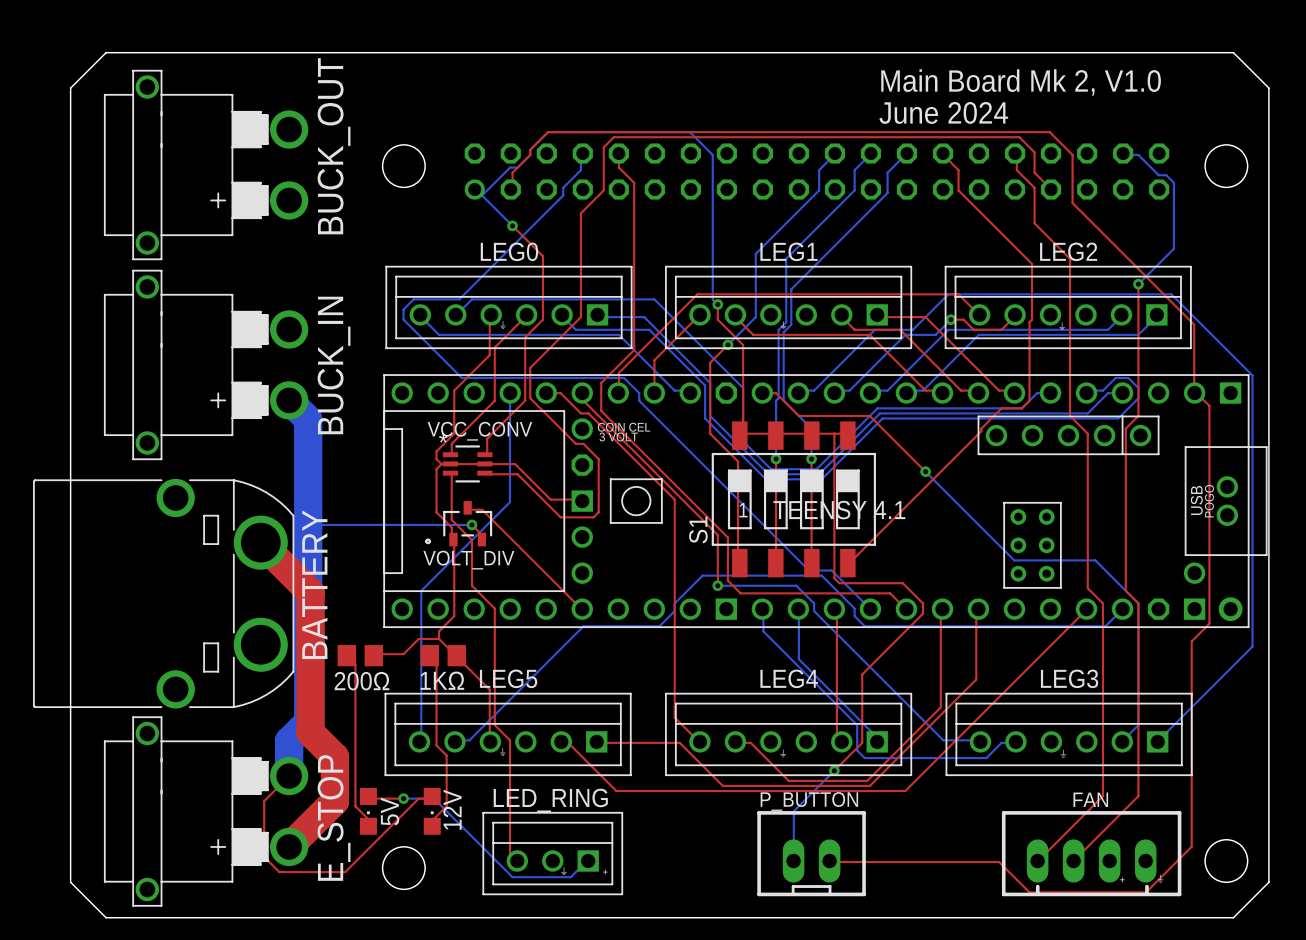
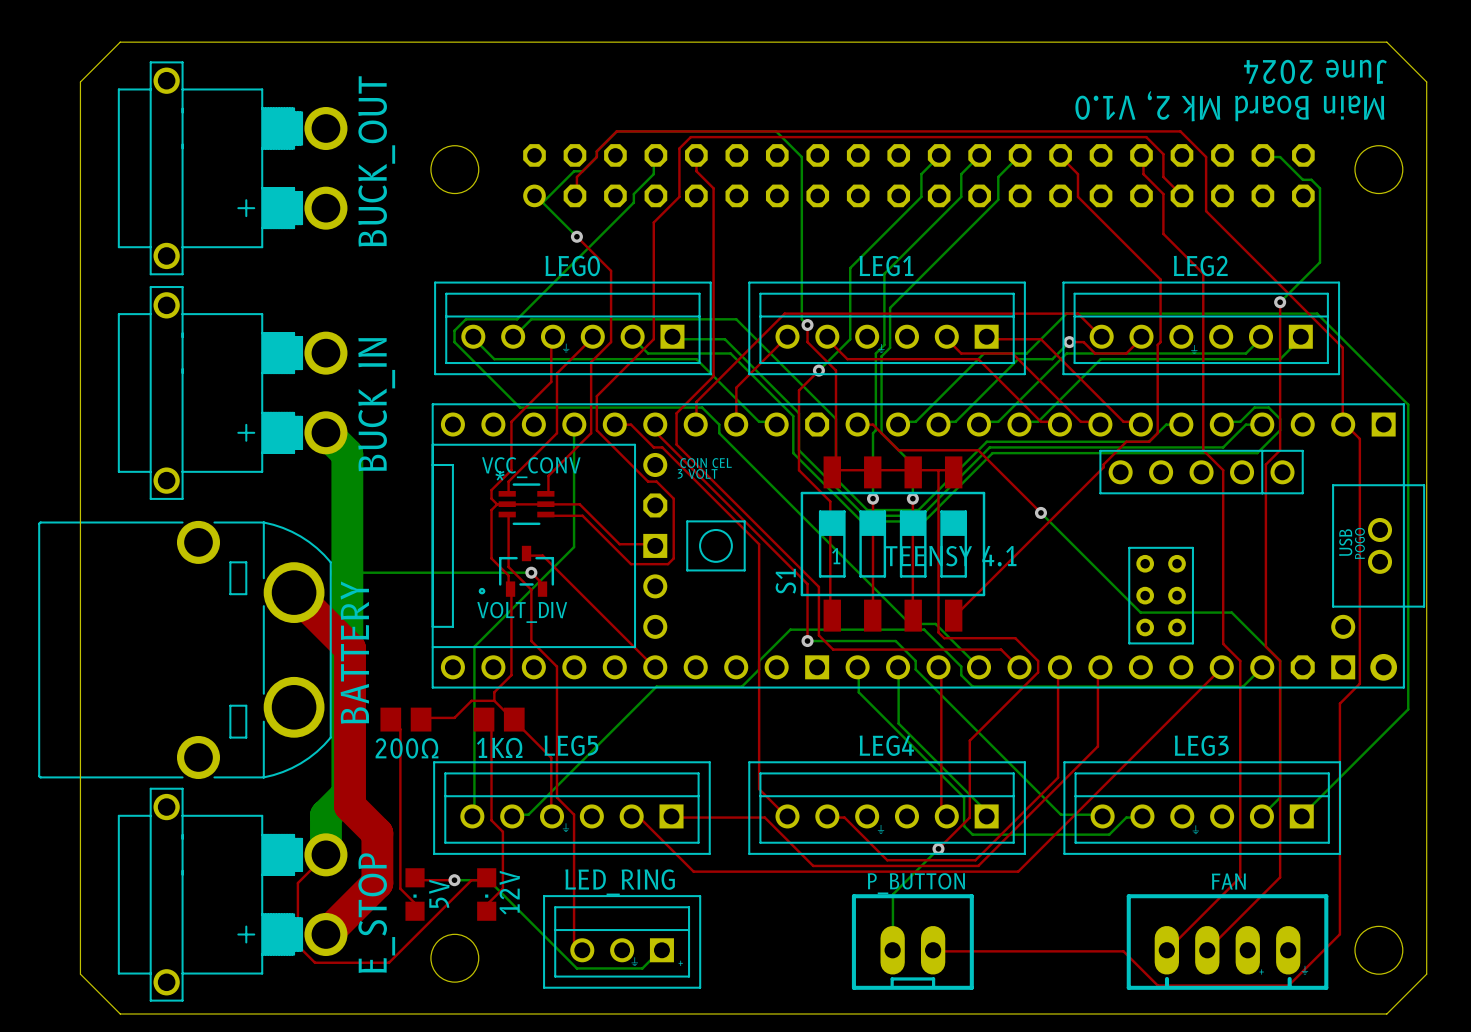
text: none -> June 2024 (1315, 71)
text: Main Board Mk 2, V1.0 (1021, 82) -> none
text: none -> Main Board Mk 2, V1.0 (1229, 106)
text: June 2024 (943, 112) -> none

